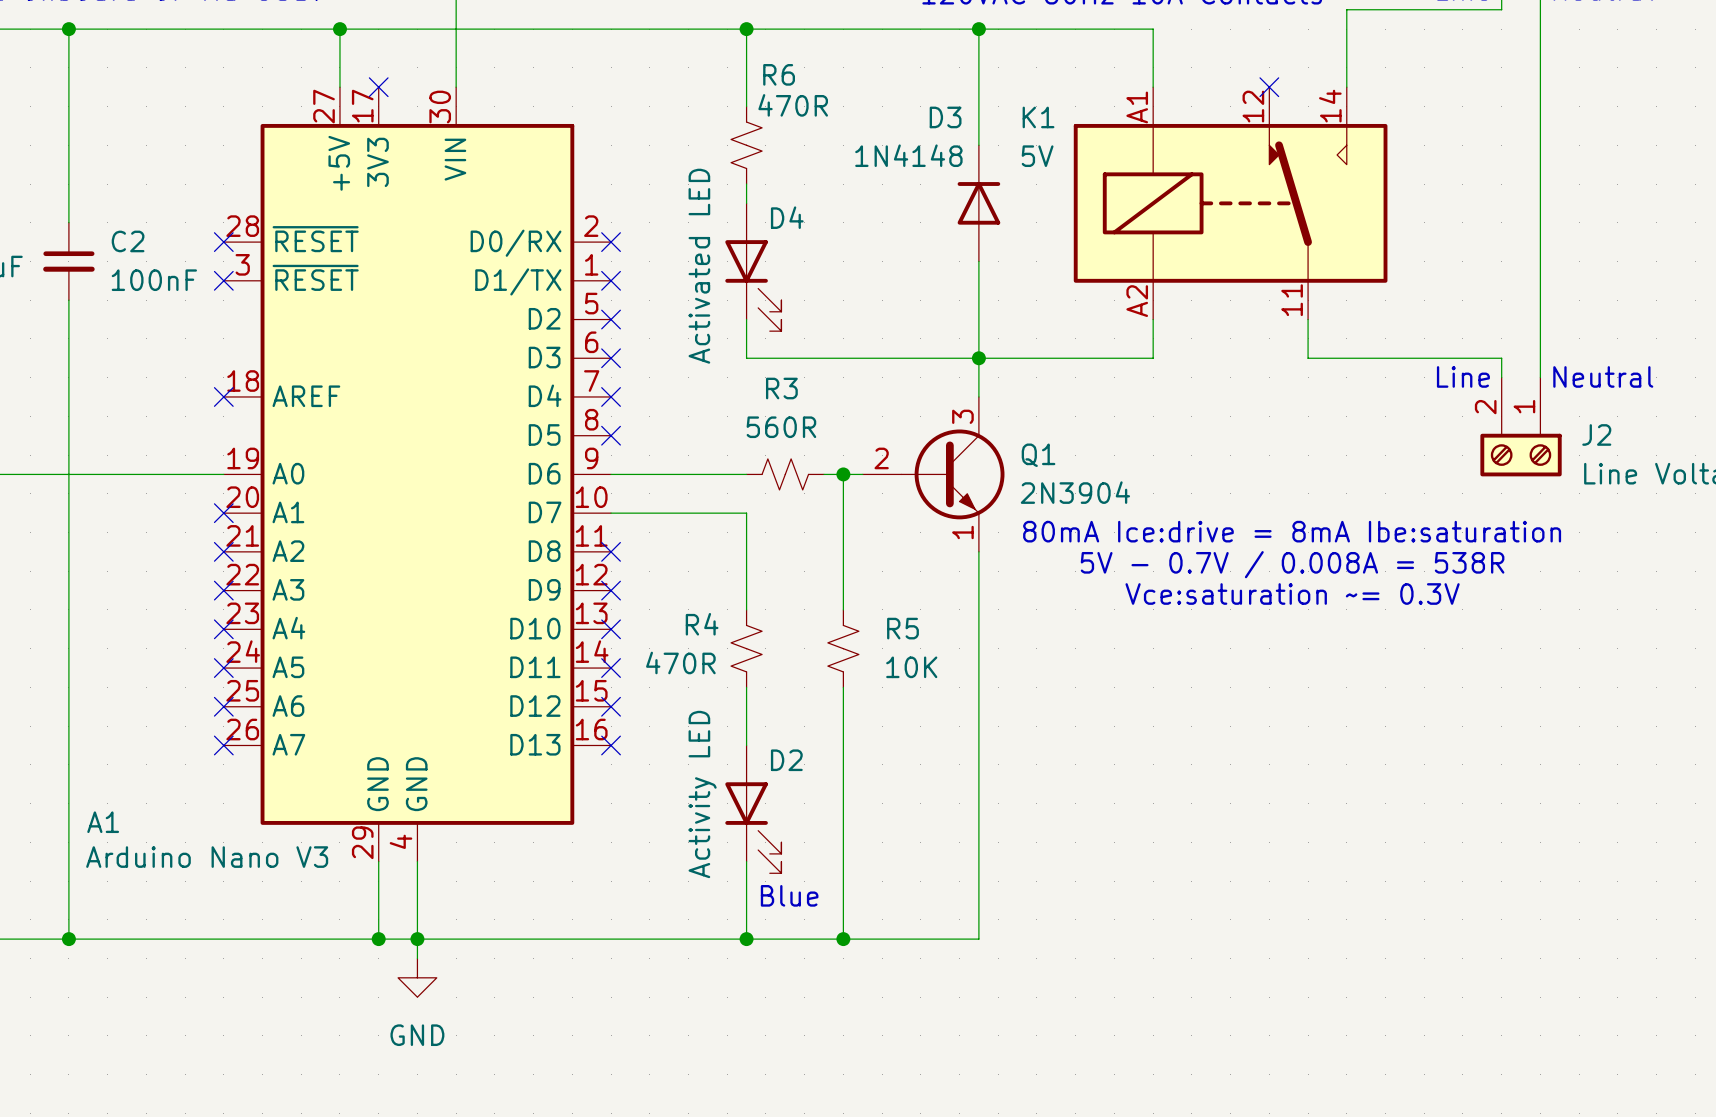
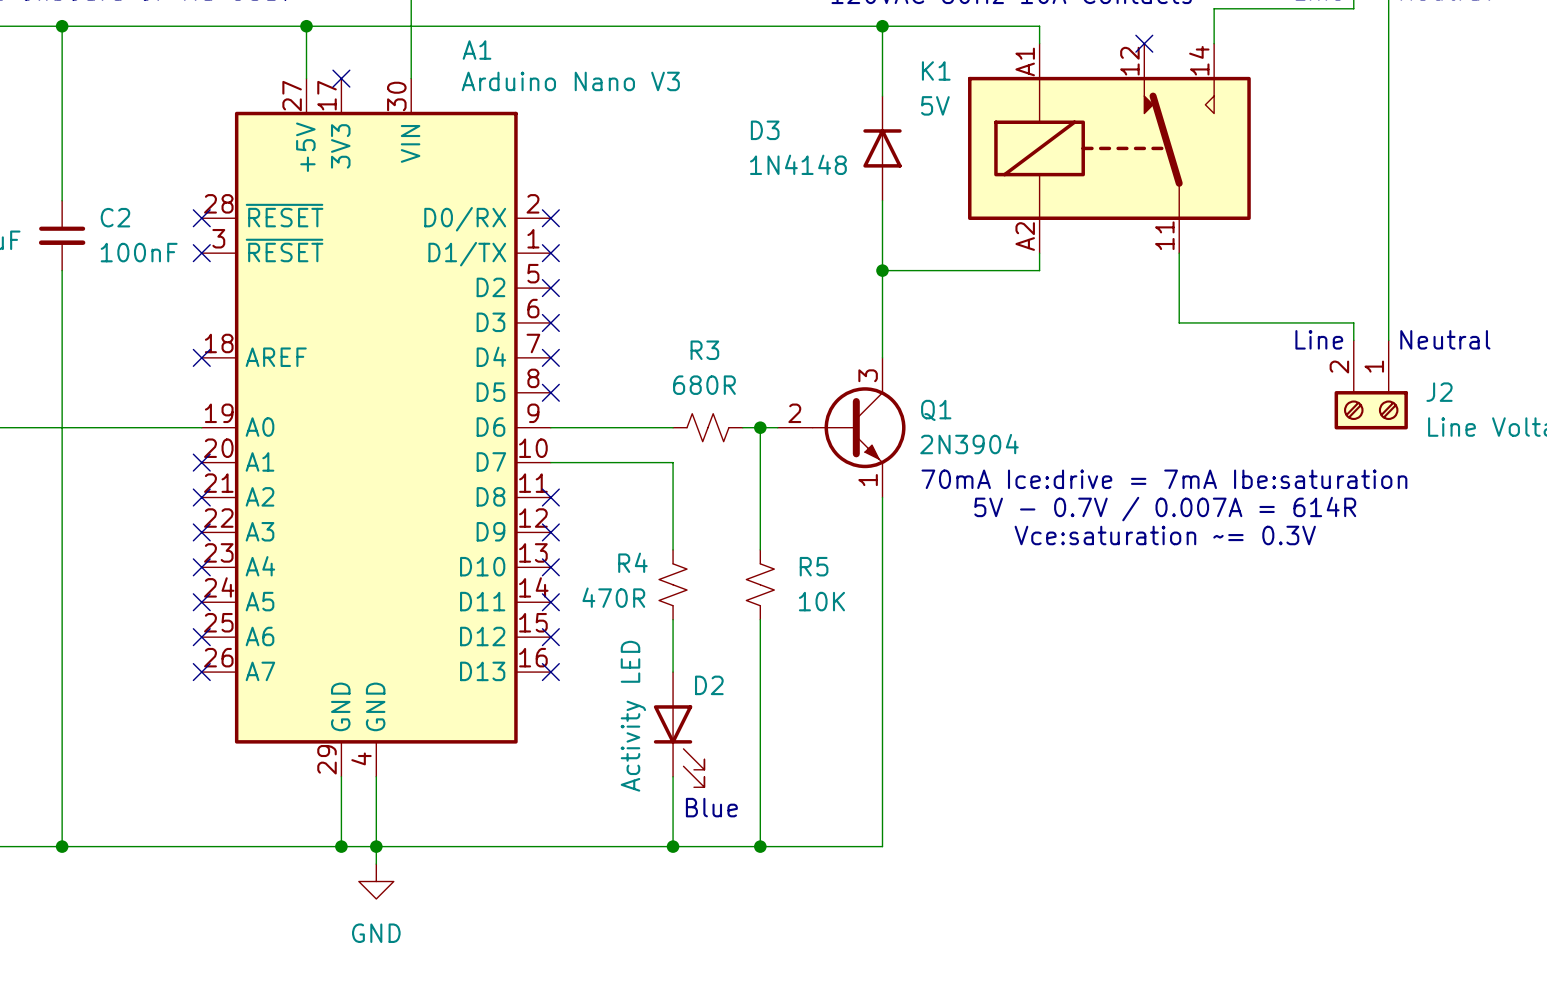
wire: (746, 29) (746, 106) -> none
junction: (746, 29) -> none
no-connect mark position: (1269, 87) -> (1144, 43)
D3 name position: D3 (945, 117) -> D3 (765, 130)
R6: 470R (746, 145) -> none
D3 value position: 1N4148 (908, 155) -> 1N4148 (798, 164)
wire: (746, 184) (746, 203) -> none
D3 position: (978, 203) -> (882, 148)
K1 position: (1230, 203) -> (1109, 148)
D4: Activated LED (753, 267) -> none
wire: none -> (1039, 253) (1039, 270) (882, 270)
wire: (746, 319) (746, 358) (1153, 358) (1153, 319) -> none
junction position: (978, 358) -> (882, 270)
R3 value: 560R (781, 427) -> 680R (704, 385)
text: 80mA Ice:drive = 8mA Ibe:saturation (1292, 531) -> 70mA Ice:drive = 7mA Ibe:saturation (1164, 479)
text: 5V - 0.7V / 0.008A = 538R (1292, 564) -> 5V - 0.7V / 0.007A = 614R (1165, 509)
A1 name position: A1 (103, 822) -> A1 (477, 50)
A1 value position: Arduino Nano V3 (207, 857) -> Arduino Nano V3 (570, 81)

